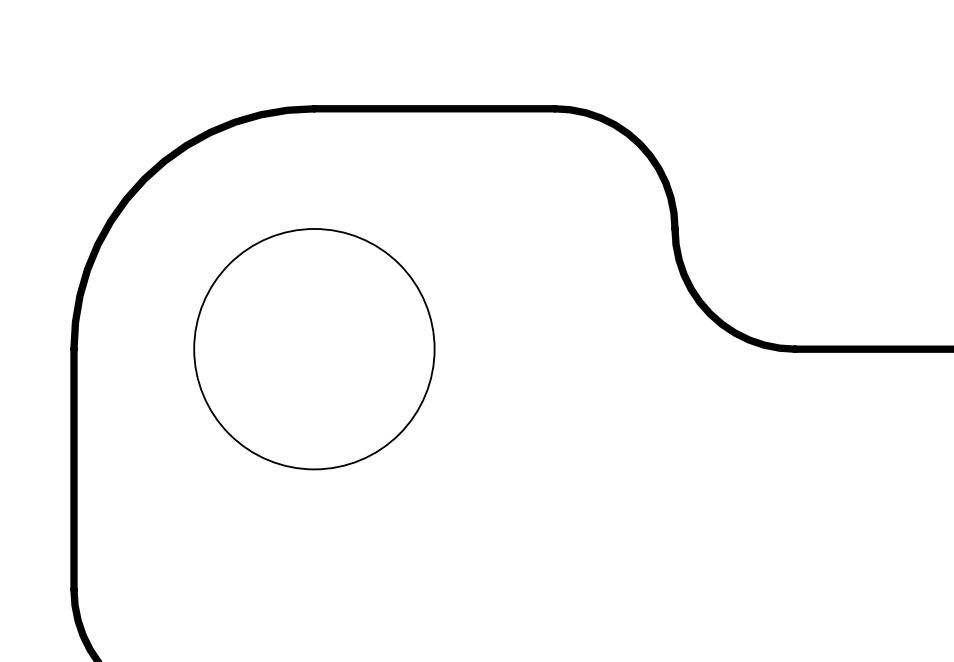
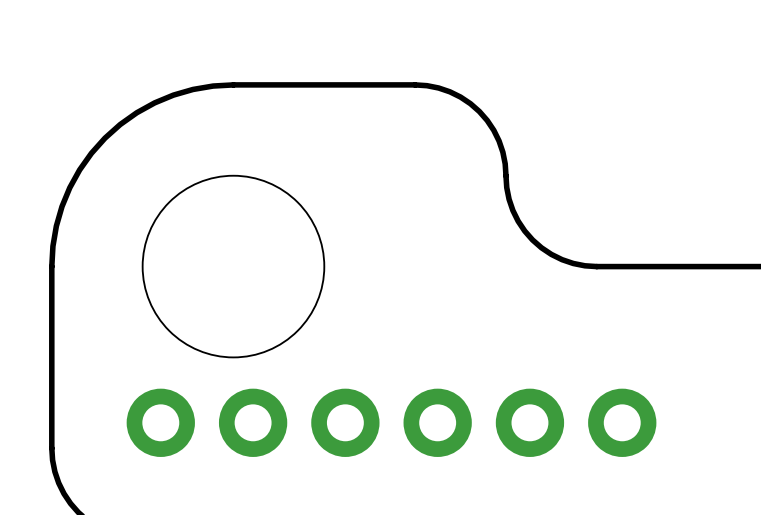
part: none -> (391, 422)

